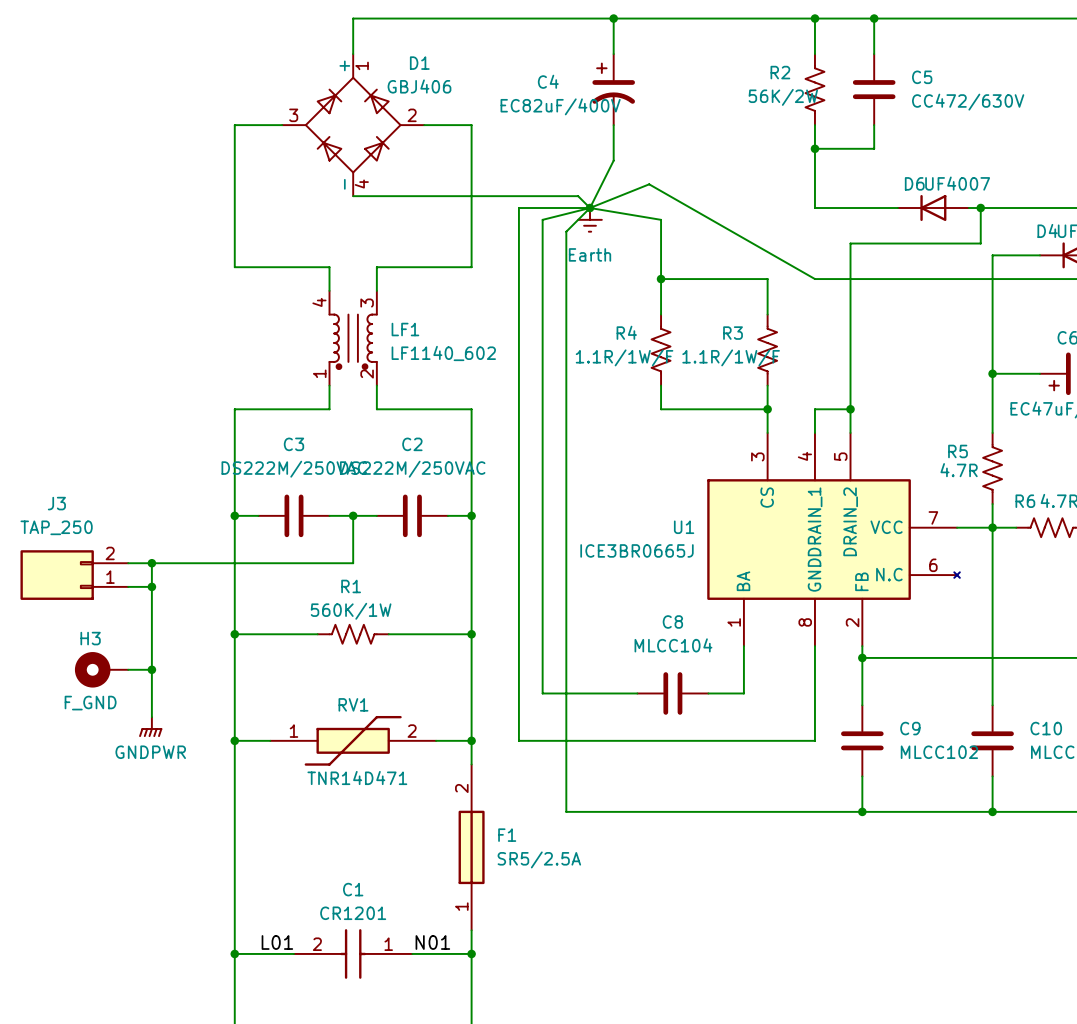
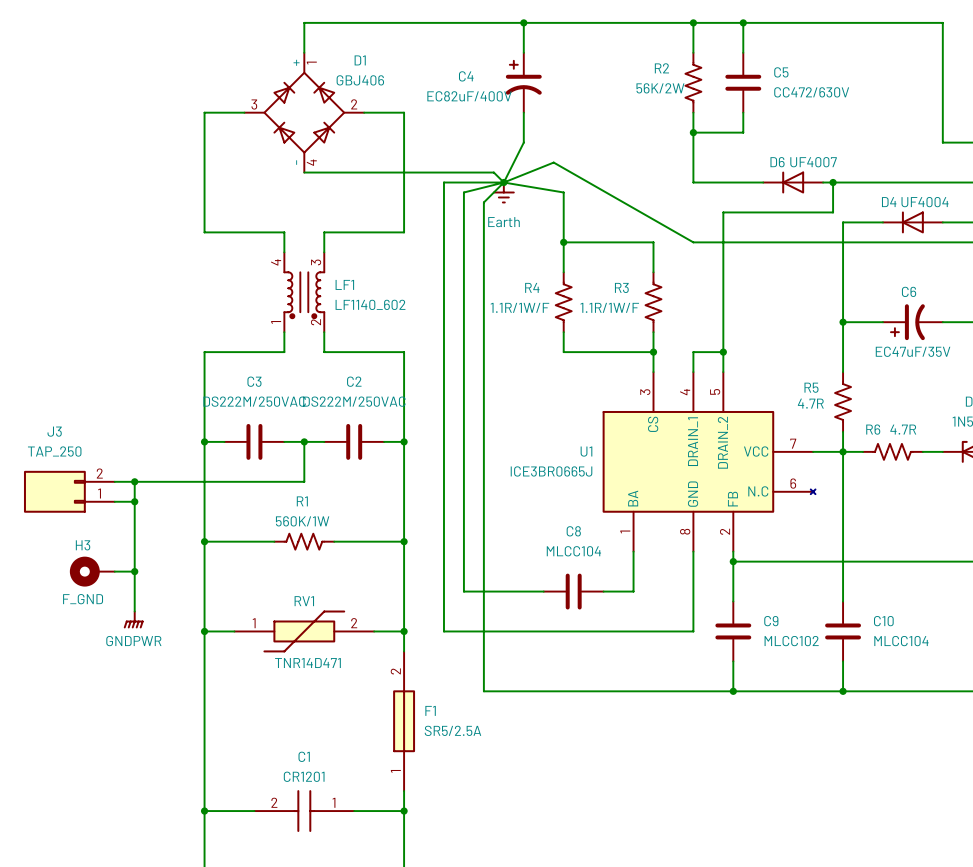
label: L01 (277, 942) -> none
label: N01 (432, 942) -> none

